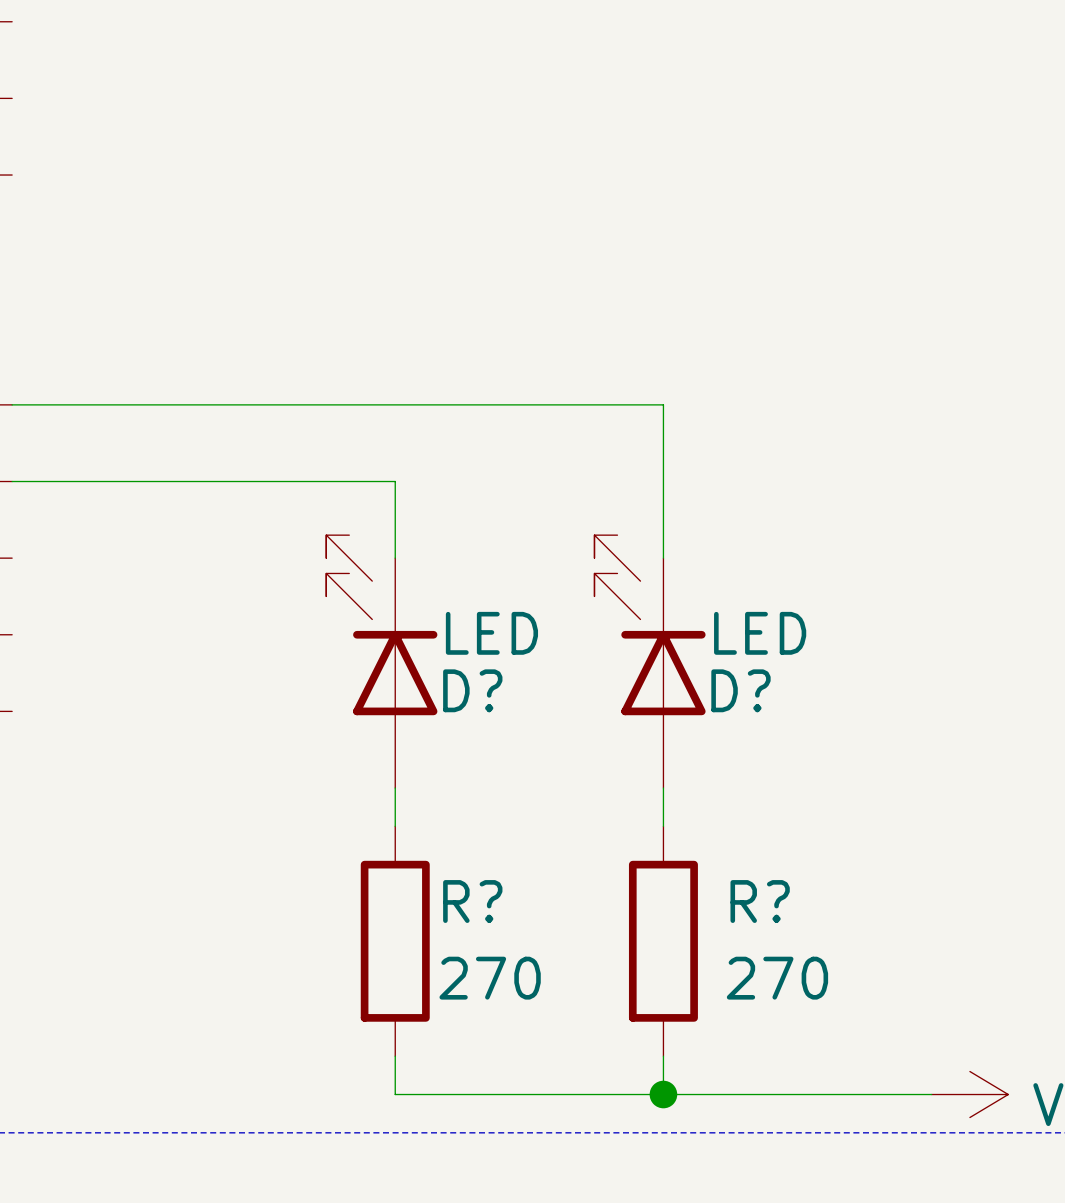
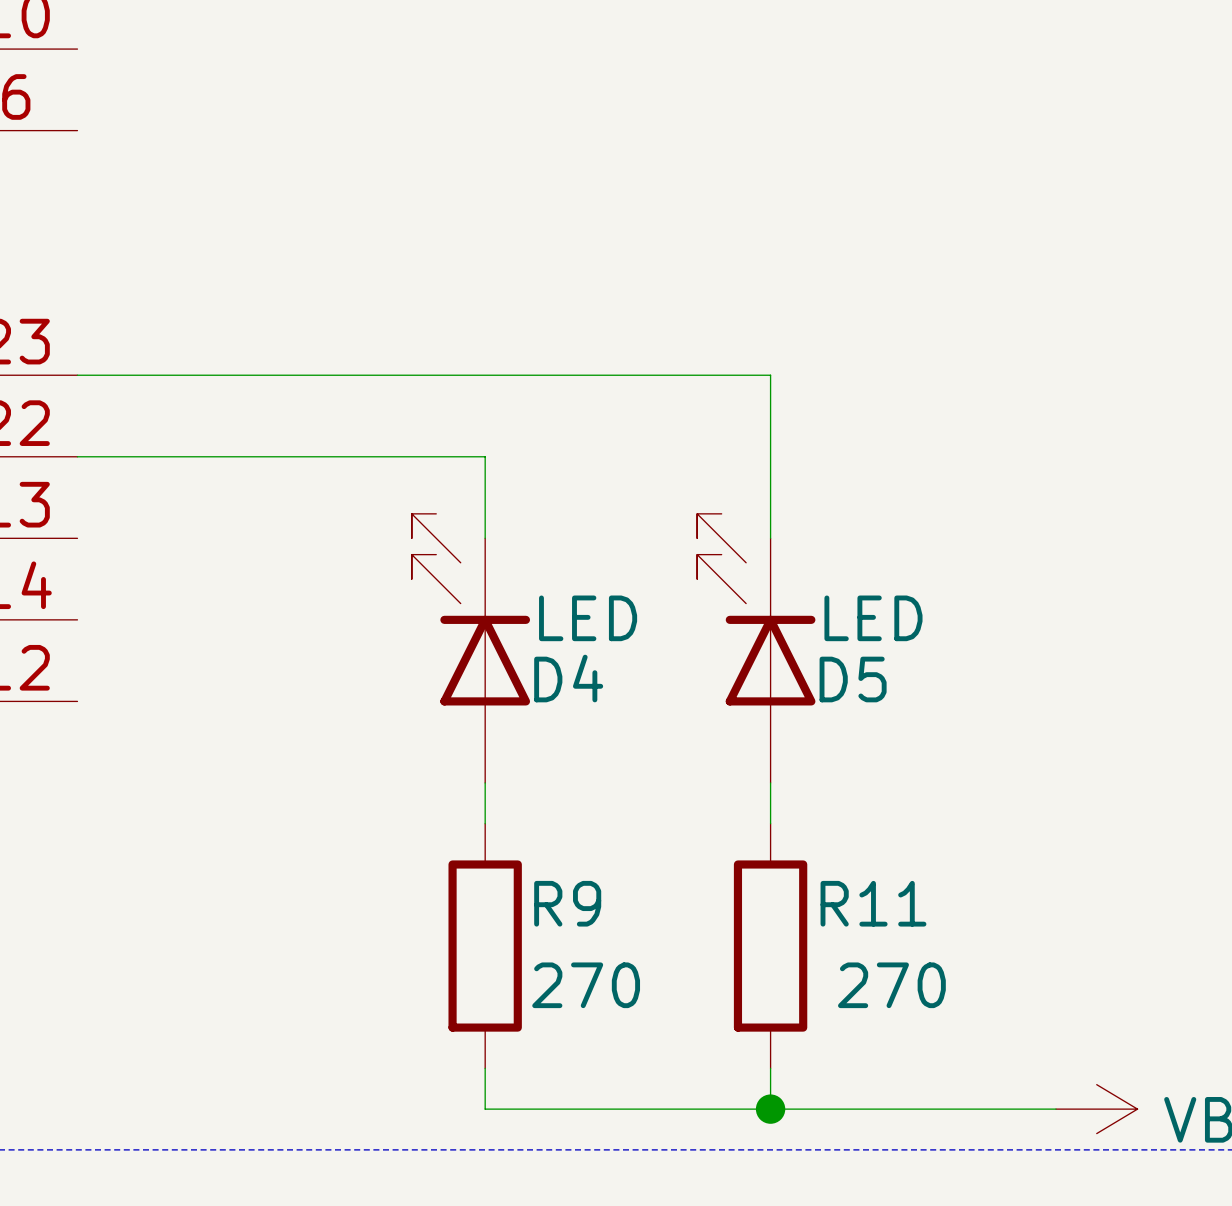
D? name: D? (472, 690) -> D4 (568, 678)
D? name: D? (740, 690) -> D5 (853, 679)
R? name: R? (472, 901) -> R9 (567, 903)
R? name: R? (760, 901) -> R11 (873, 903)

